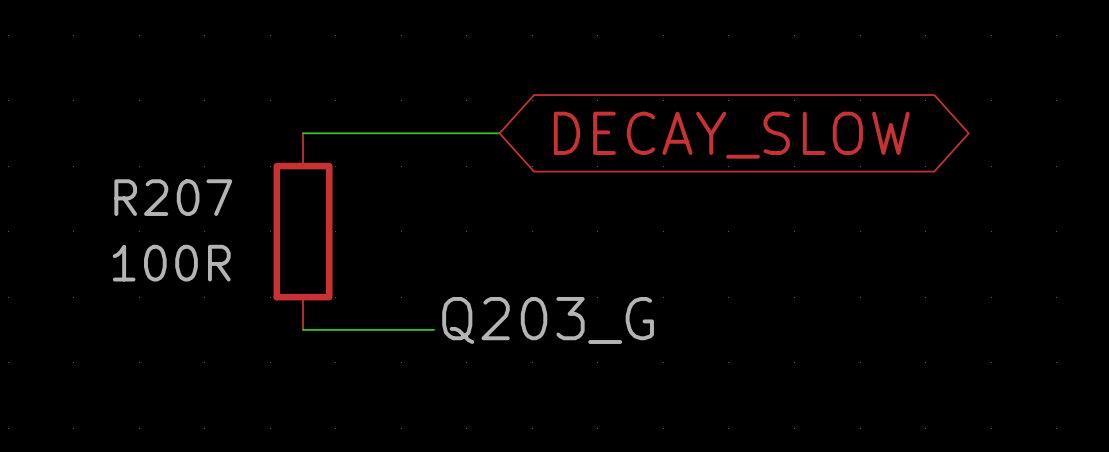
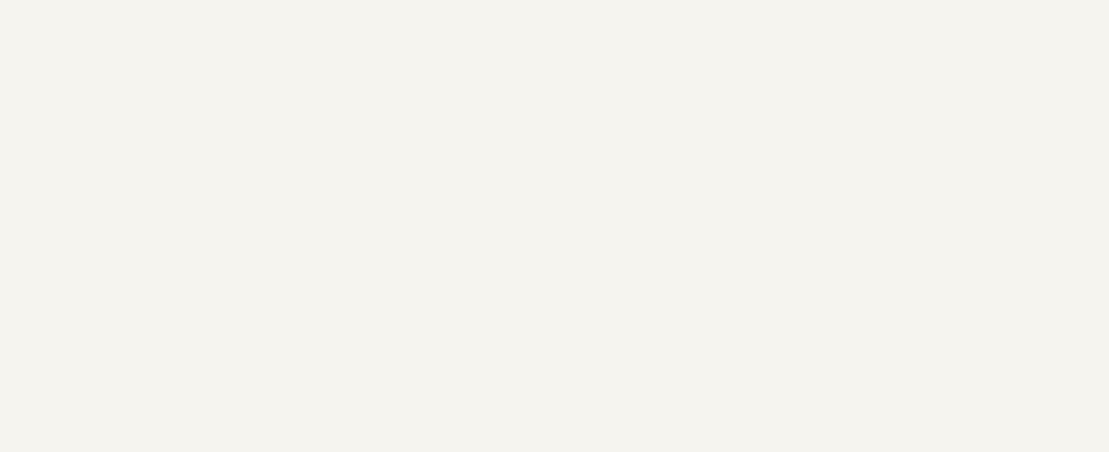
wire: (303, 133) (499, 133) -> none
global label: DECAY_SLOW (731, 135) -> none
R207: 100R (303, 231) -> none
label: Q203_G (548, 320) -> none
wire: (303, 329) (434, 329) -> none

